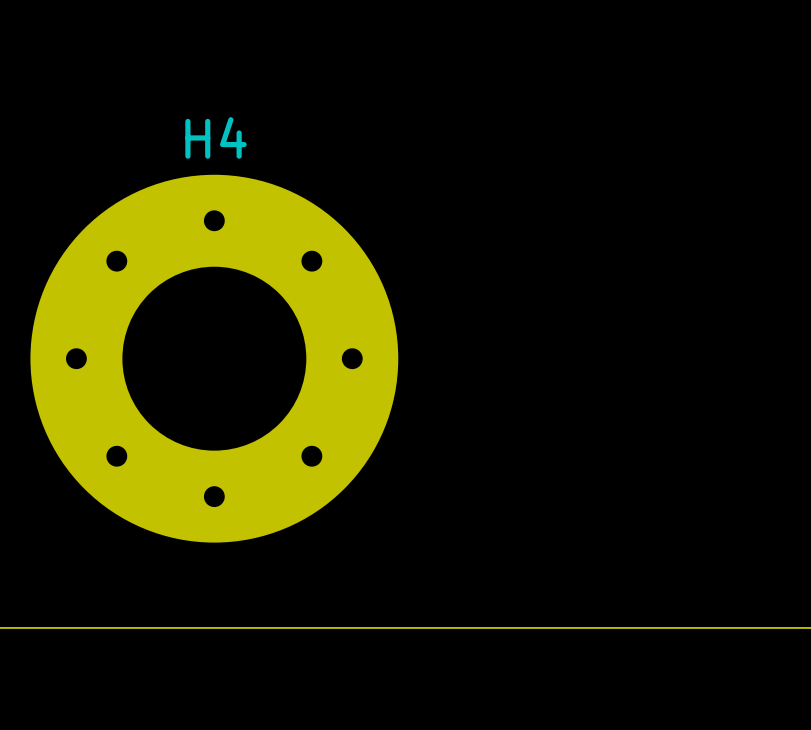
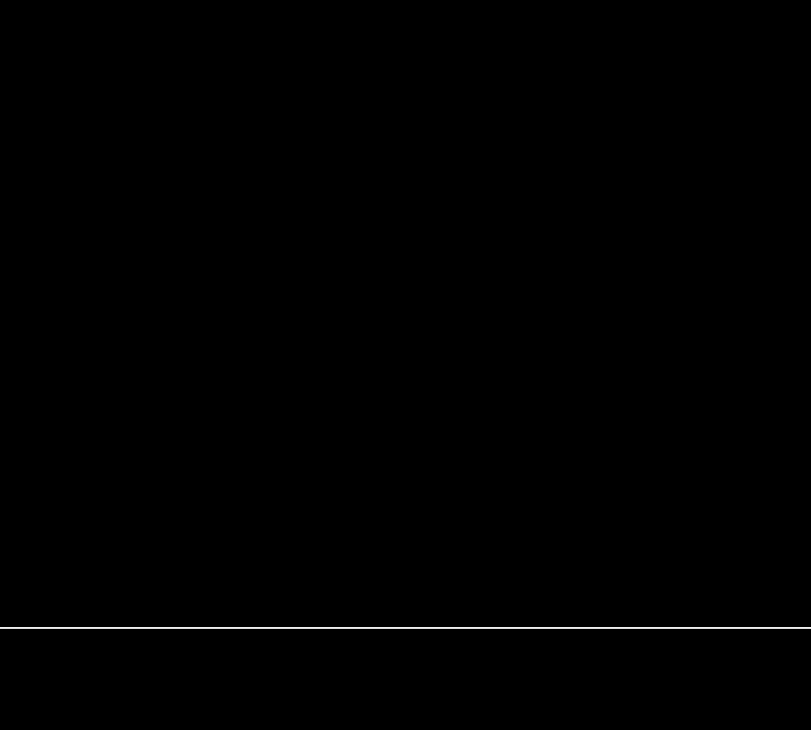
H4: (214, 358) -> none

